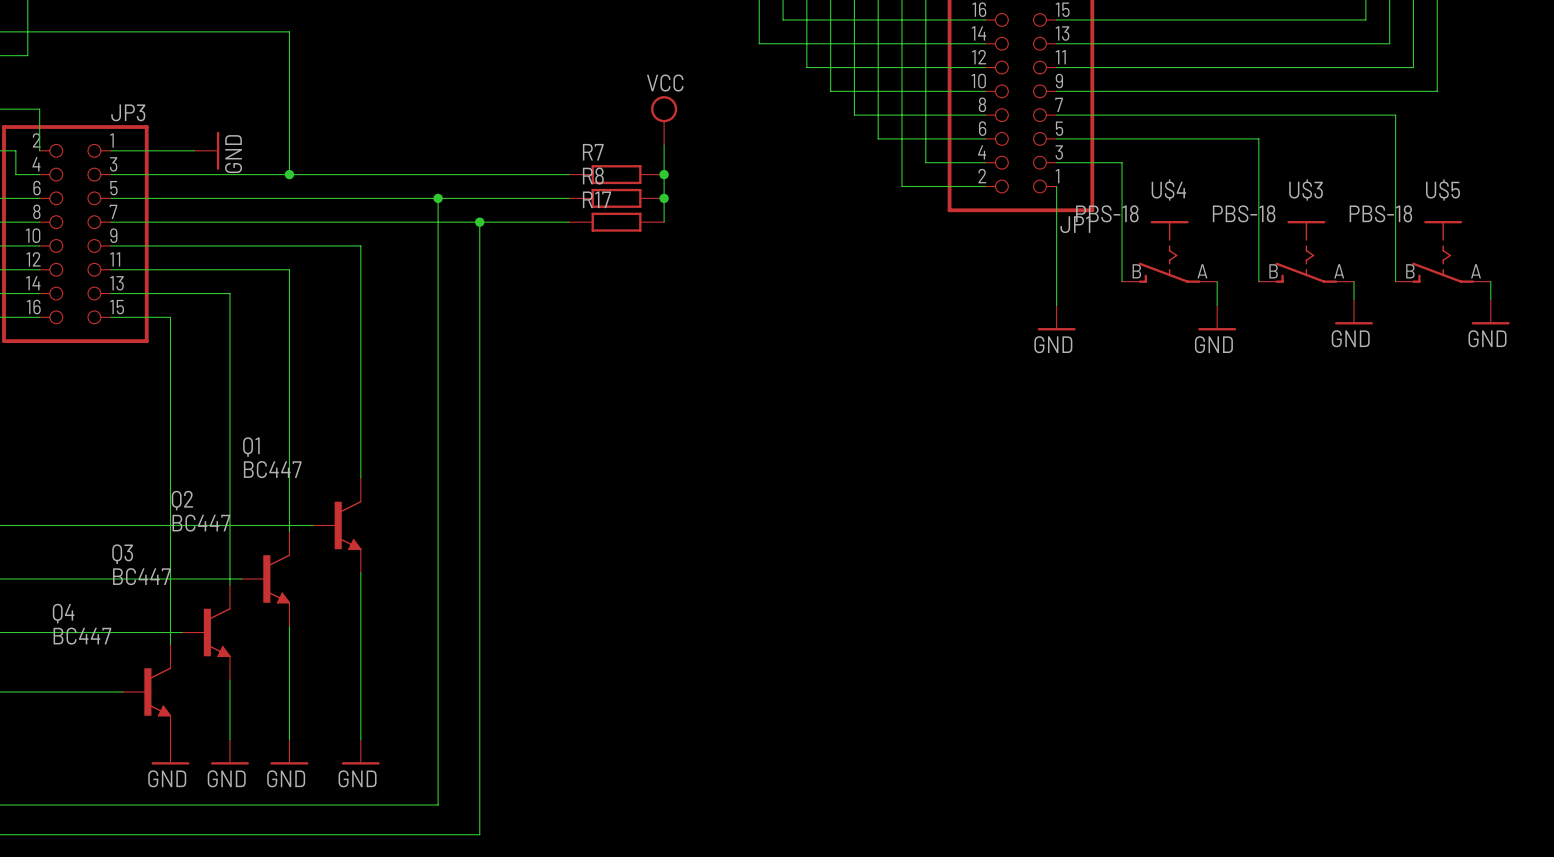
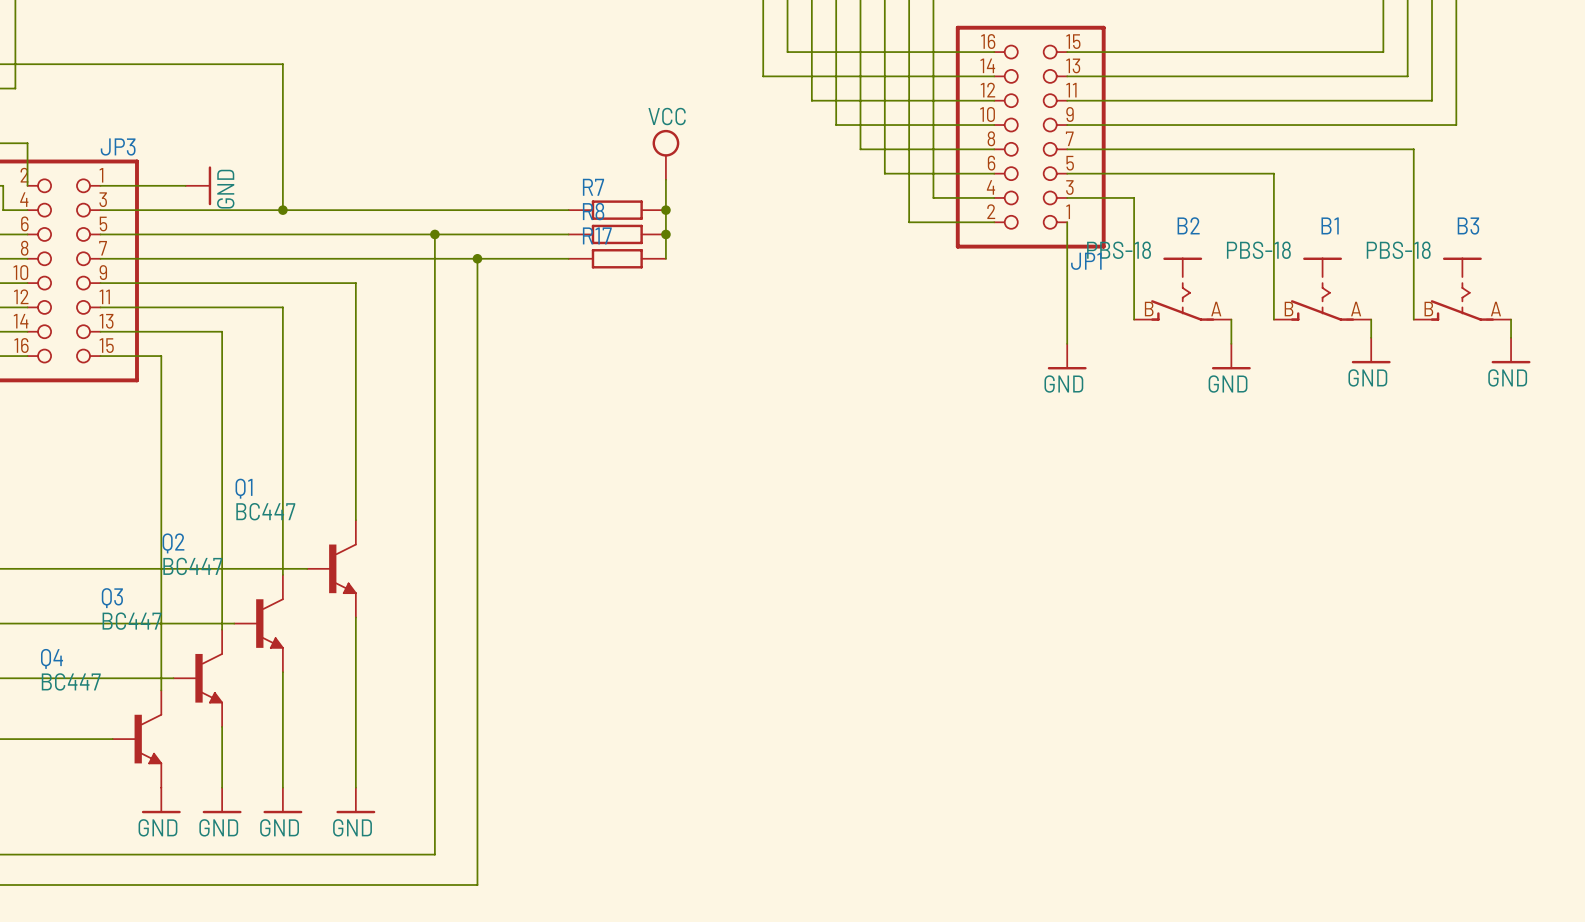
U$4 name: U$4 (1168, 189) -> B2 (1188, 225)
U$3 name: U$3 (1306, 189) -> B1 (1330, 225)
U$5 name: U$5 (1442, 189) -> B3 (1468, 226)

